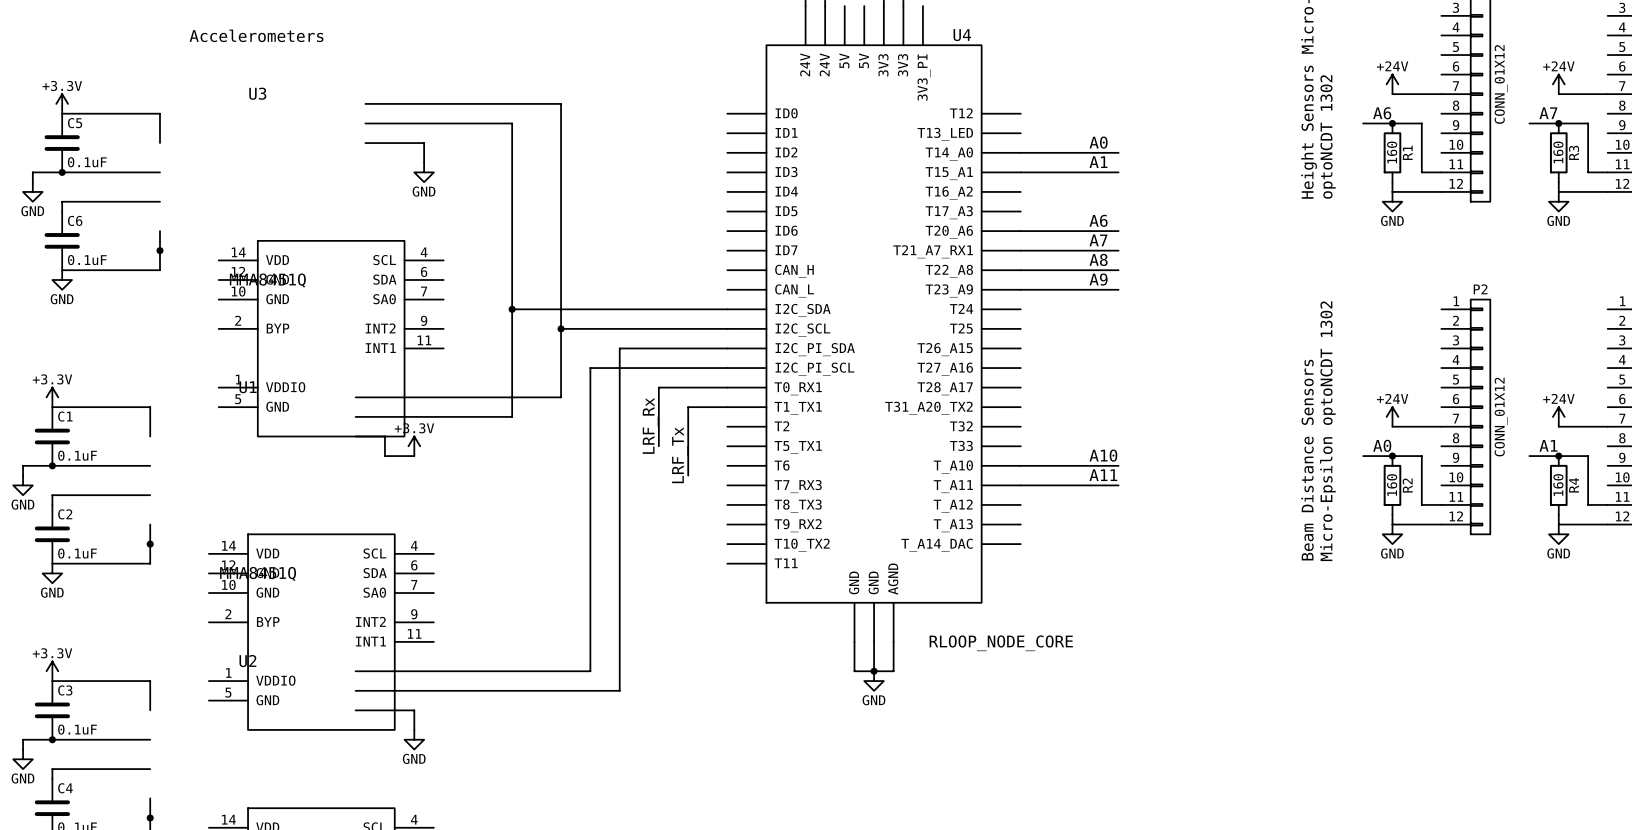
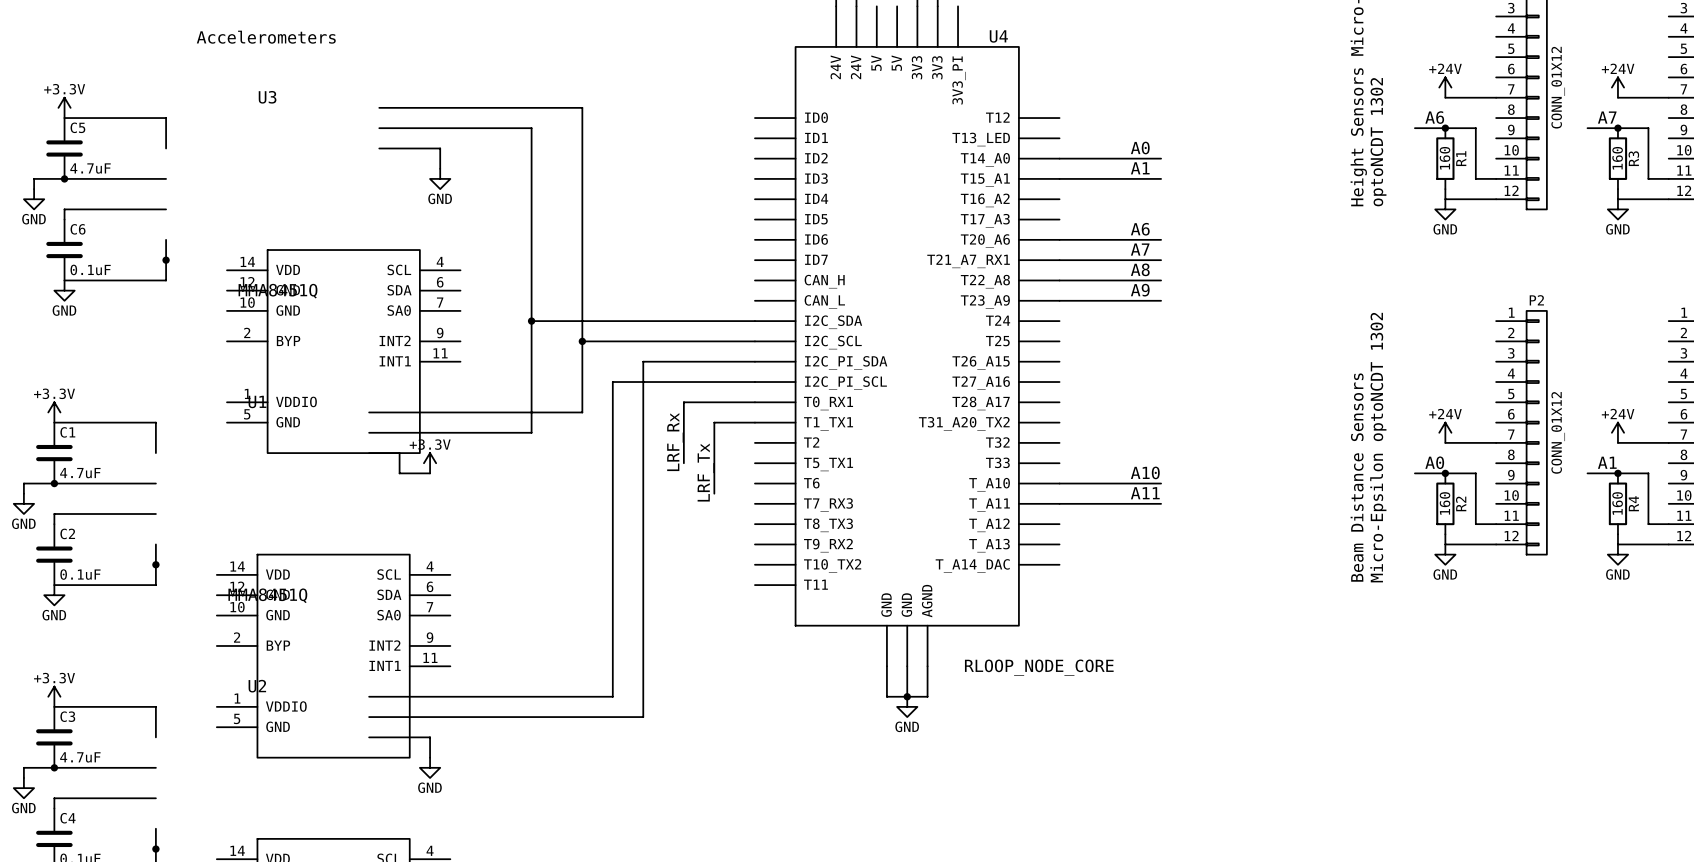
C5 value: 0.1uF (87, 162) -> 4.7uF (90, 168)
C1 value: 0.1uF (77, 455) -> 4.7uF (80, 473)
C3 value: 0.1uF (77, 729) -> 4.7uF (80, 757)

